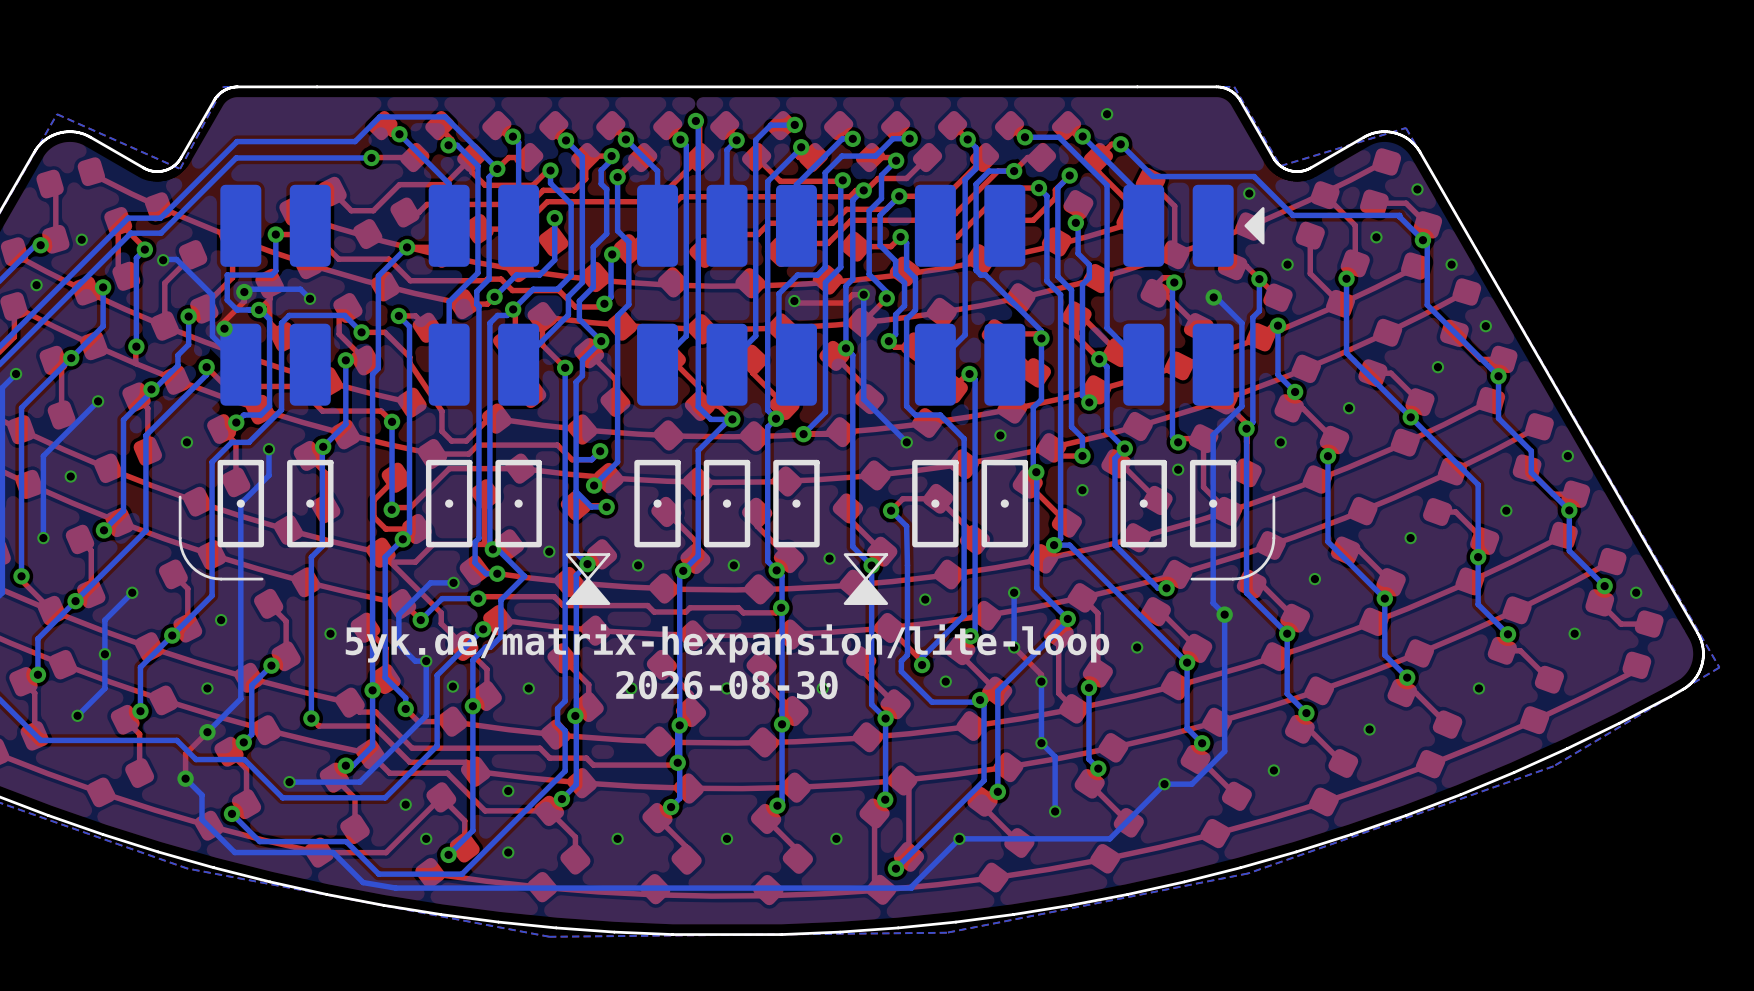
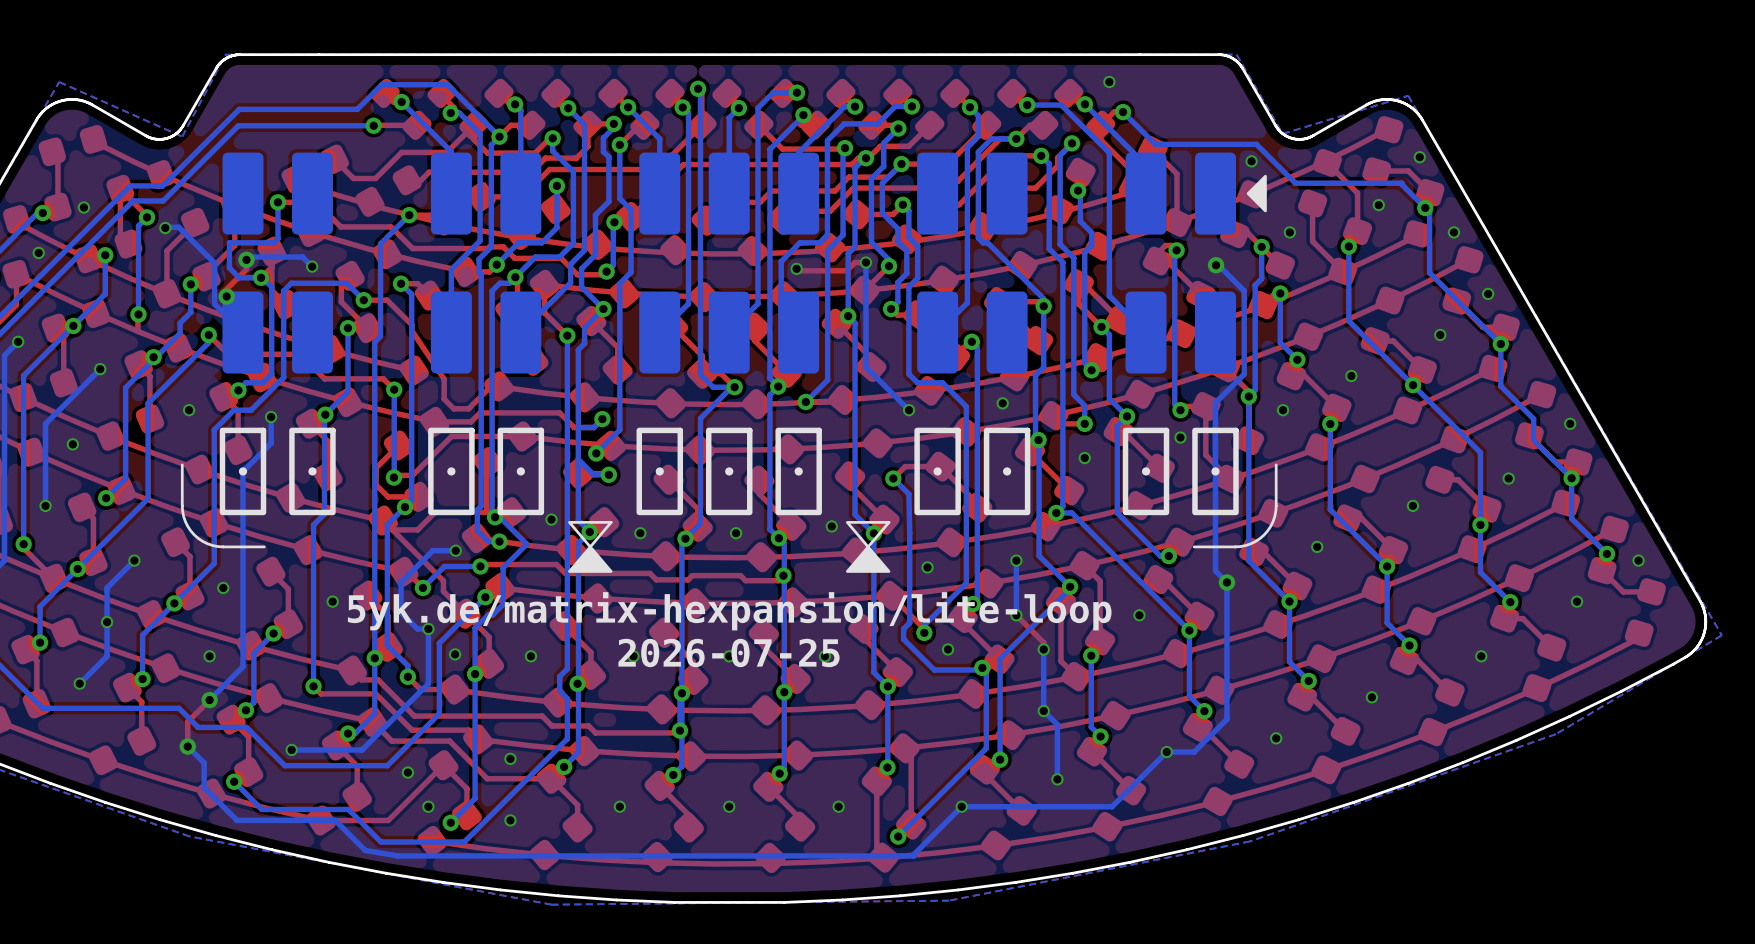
text: 2026-08-30 (726, 685) -> 2026-07-25 (729, 653)

